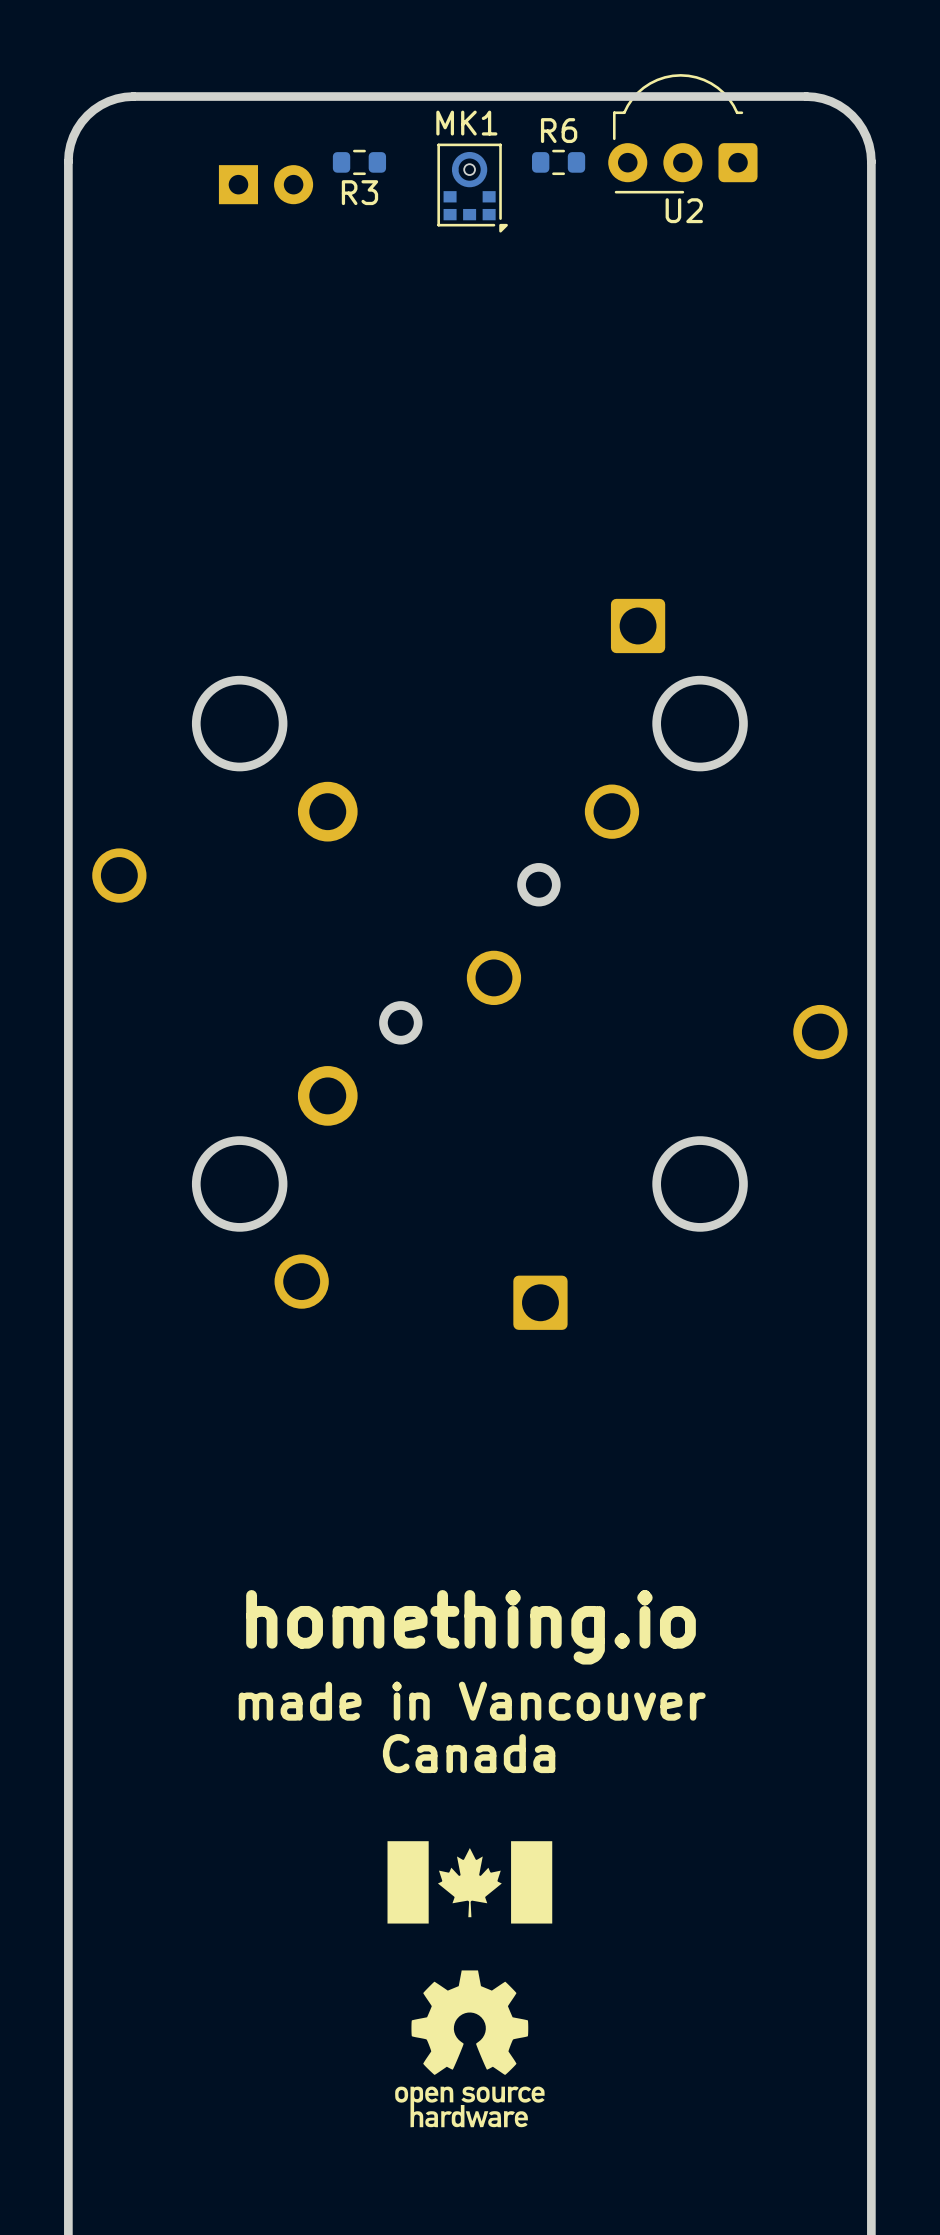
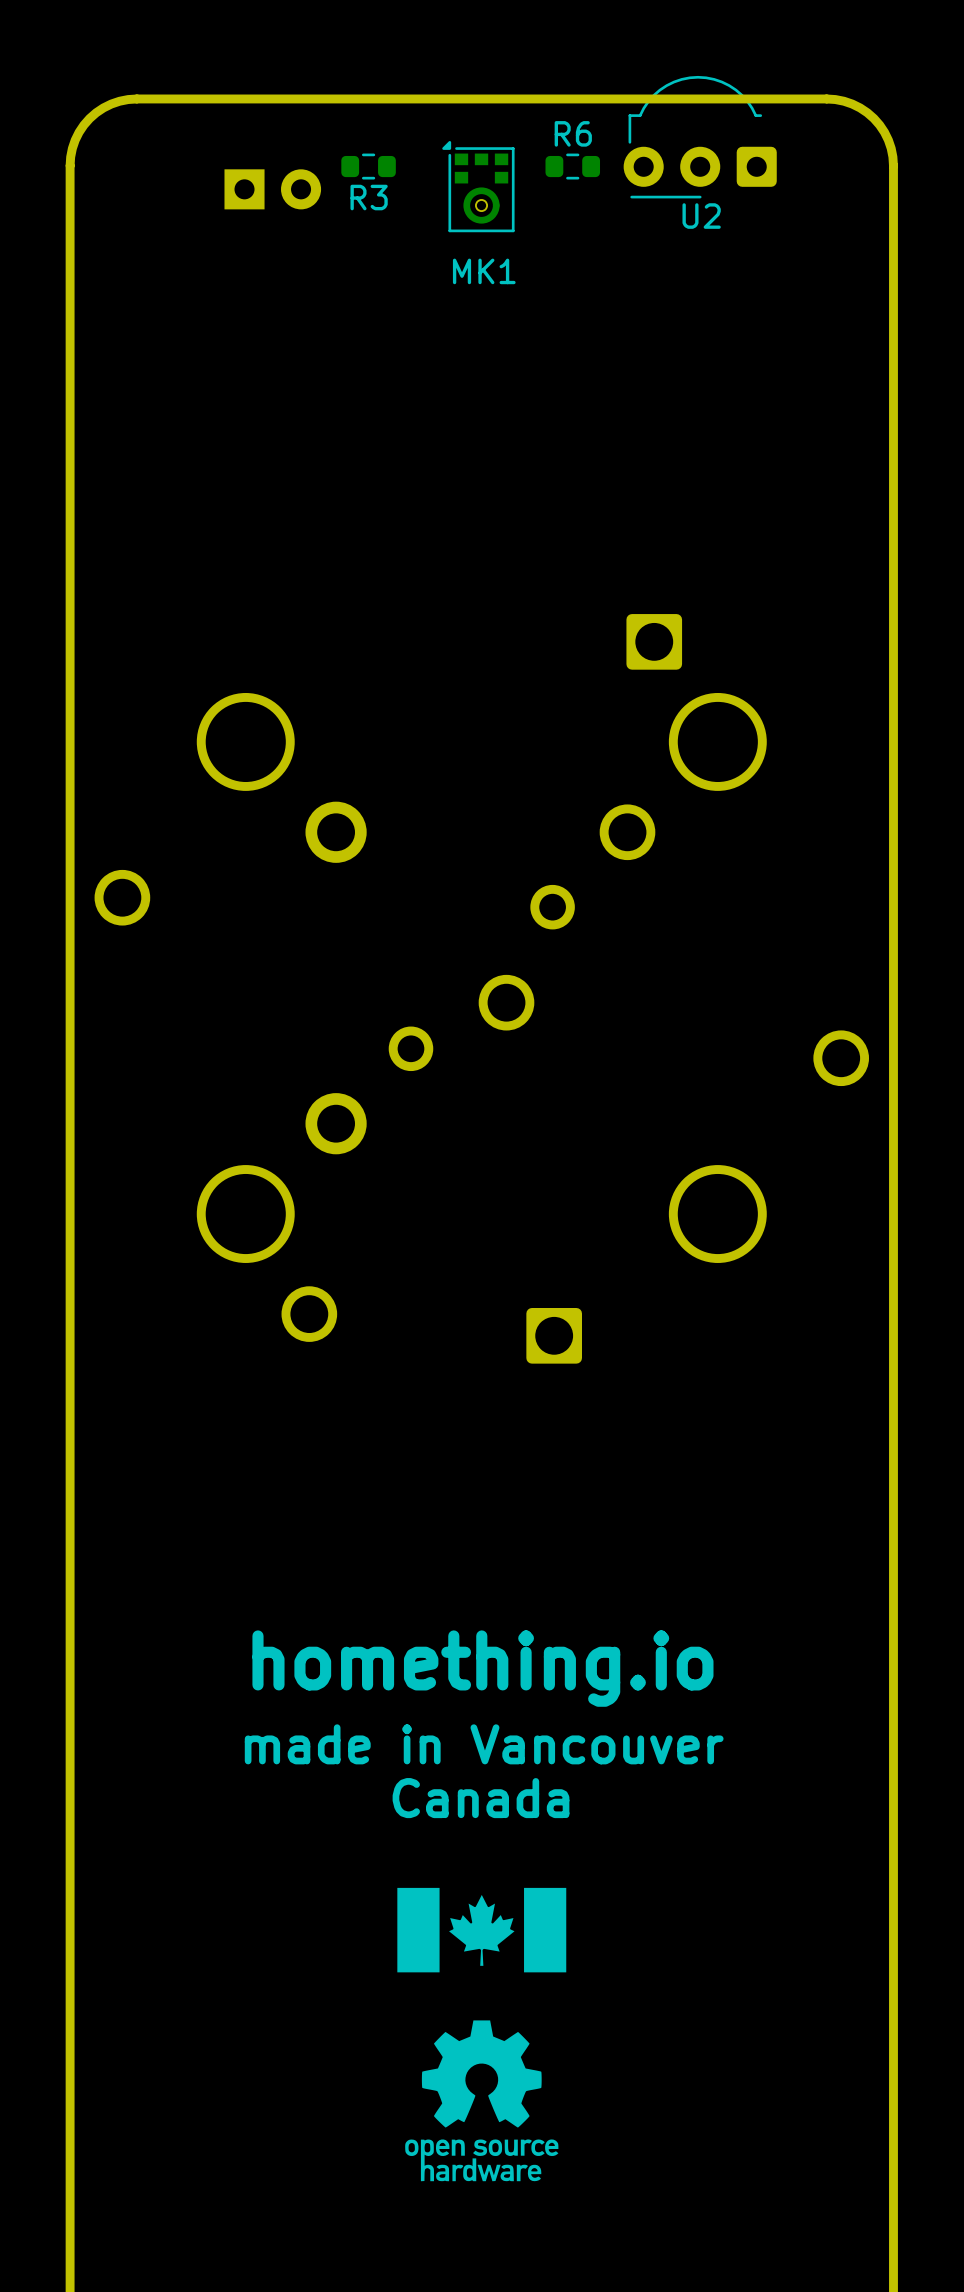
MK1 rotation: 0° (472, 188) -> 180° (478, 186)

